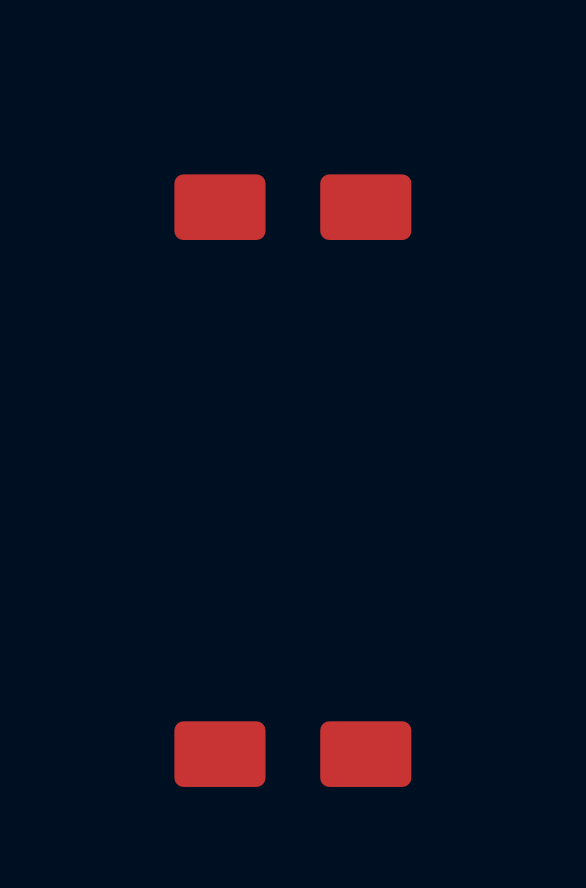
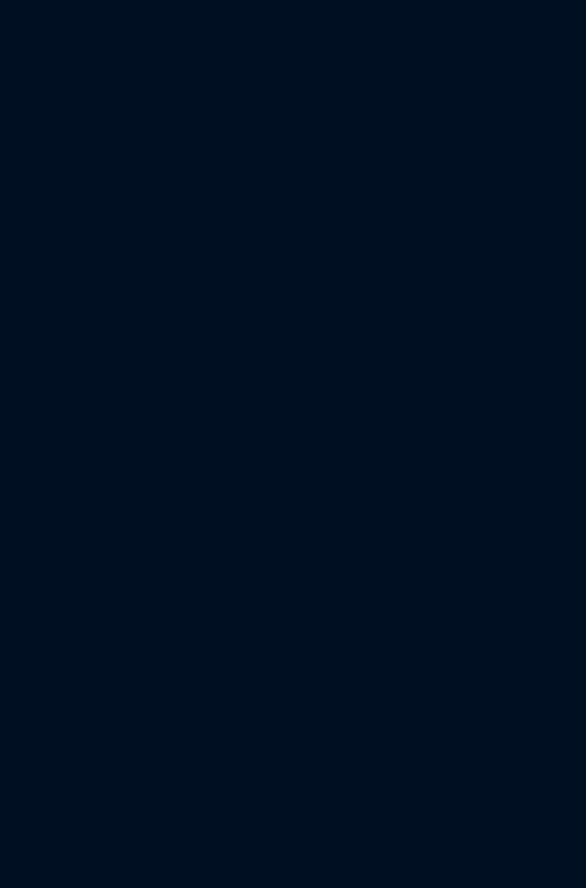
part: (292, 207) -> none
part: (292, 754) -> none

